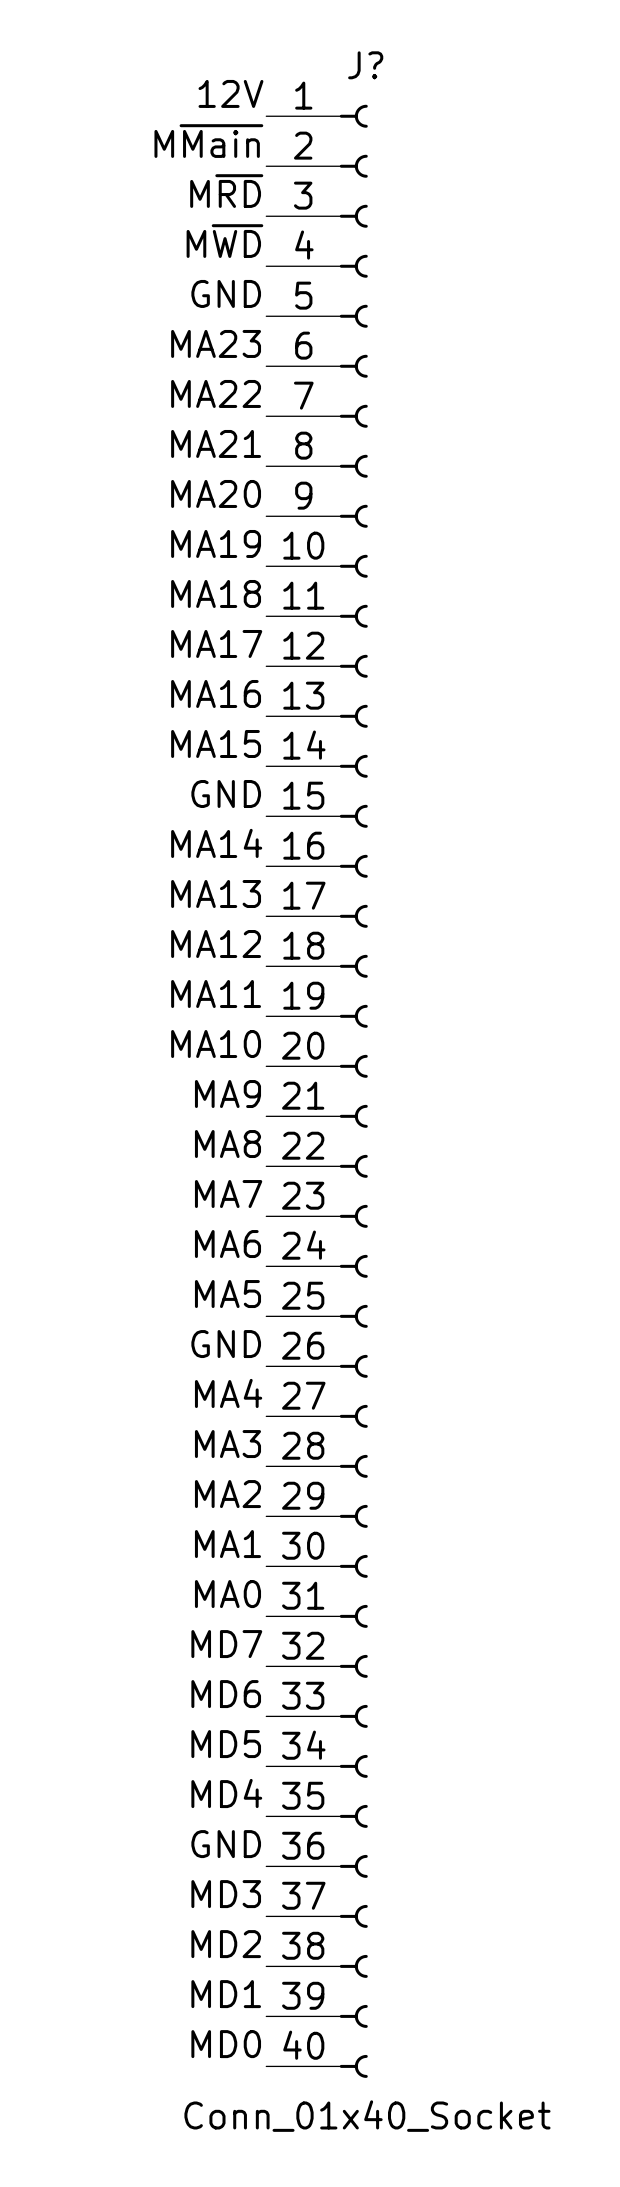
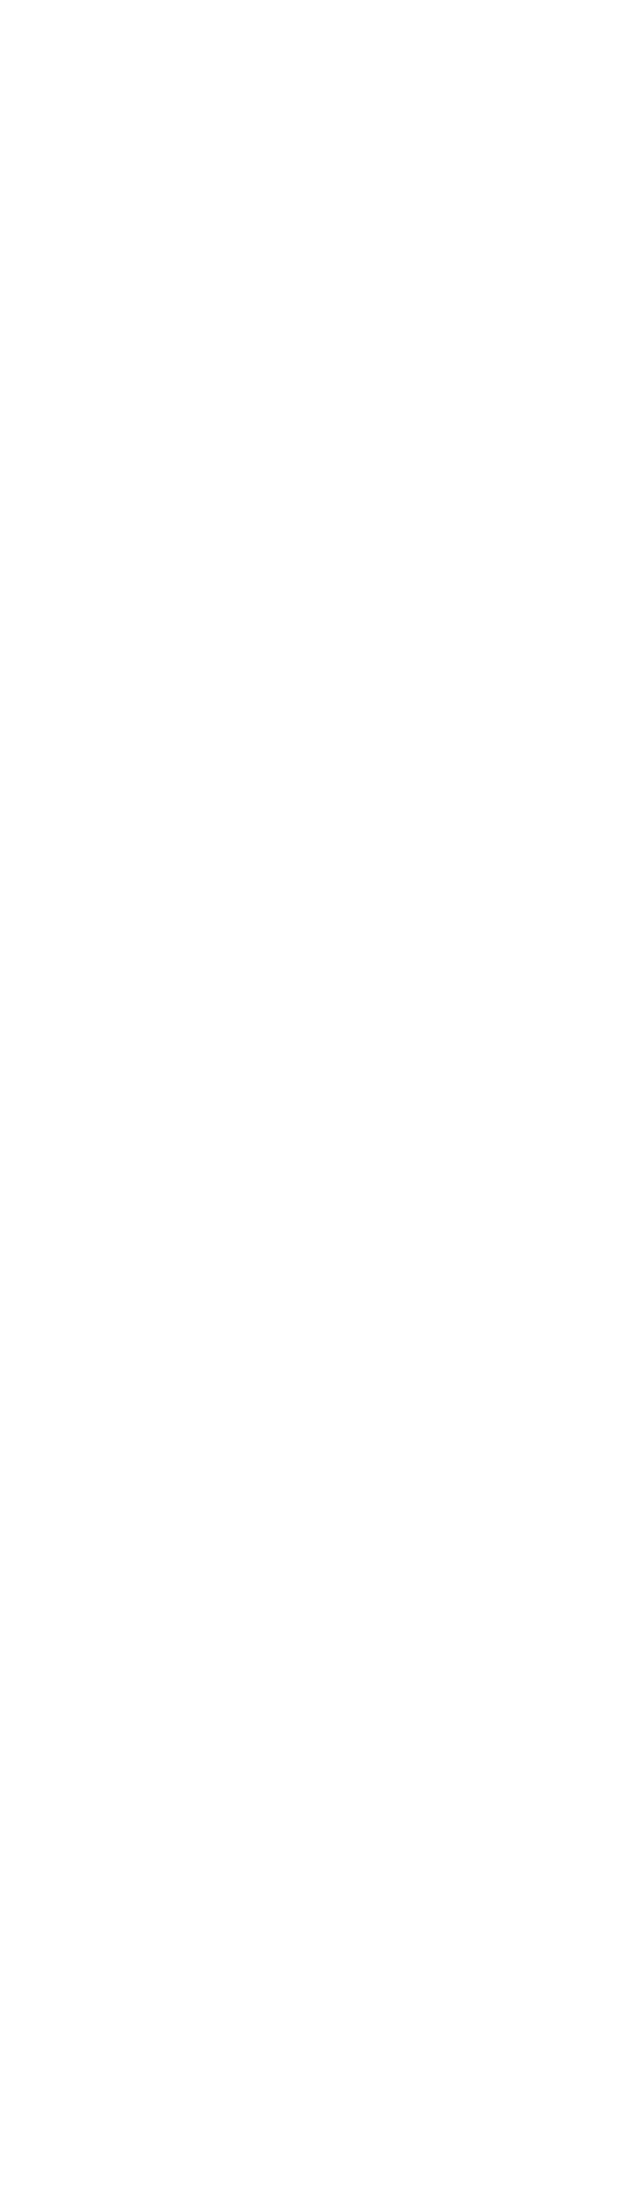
label: 12V (230, 93) -> none
label: M~{Main} (208, 141) -> none
label: M~{RD} (226, 191) -> none
label: M~{WD} (224, 241) -> none
label: GND (226, 293) -> none
label: MA23 (216, 343) -> none
label: MA22 (216, 393) -> none
label: MA21 (216, 443) -> none
label: MA20 (216, 493) -> none
label: MA19 (216, 543) -> none
label: MA18 (216, 593) -> none
label: MA17 (216, 643) -> none
label: MA16 (216, 693) -> none
label: MA15 (216, 743) -> none
label: GND (226, 793) -> none
label: MA14 (216, 843) -> none
label: MA13 (216, 894) -> none
label: MA12 (216, 944) -> none
label: MA11 (216, 994) -> none
label: MA10 (216, 1044) -> none
J?: Conn_01x40_Socket (317, 1091) -> none
label: MA9 (227, 1094) -> none
label: MA8 (227, 1144) -> none
label: MA7 (228, 1194) -> none
label: MA6 (227, 1244) -> none
label: MA5 (227, 1294) -> none
label: GND (226, 1344) -> none
label: MA4 (228, 1393) -> none
label: MA3 (227, 1444) -> none
label: MA2 (227, 1494) -> none
label: MA1 (227, 1544) -> none
label: MA0 (227, 1594) -> none
label: MD7 (226, 1644) -> none
label: MD6 (226, 1694) -> none
label: MD5 (226, 1744) -> none
label: MD4 (226, 1793) -> none
label: GND (226, 1844) -> none
label: MD3 (226, 1894) -> none
label: MD2 (226, 1944) -> none
label: MD1 (226, 1994) -> none
label: MD0 (226, 2044) -> none

